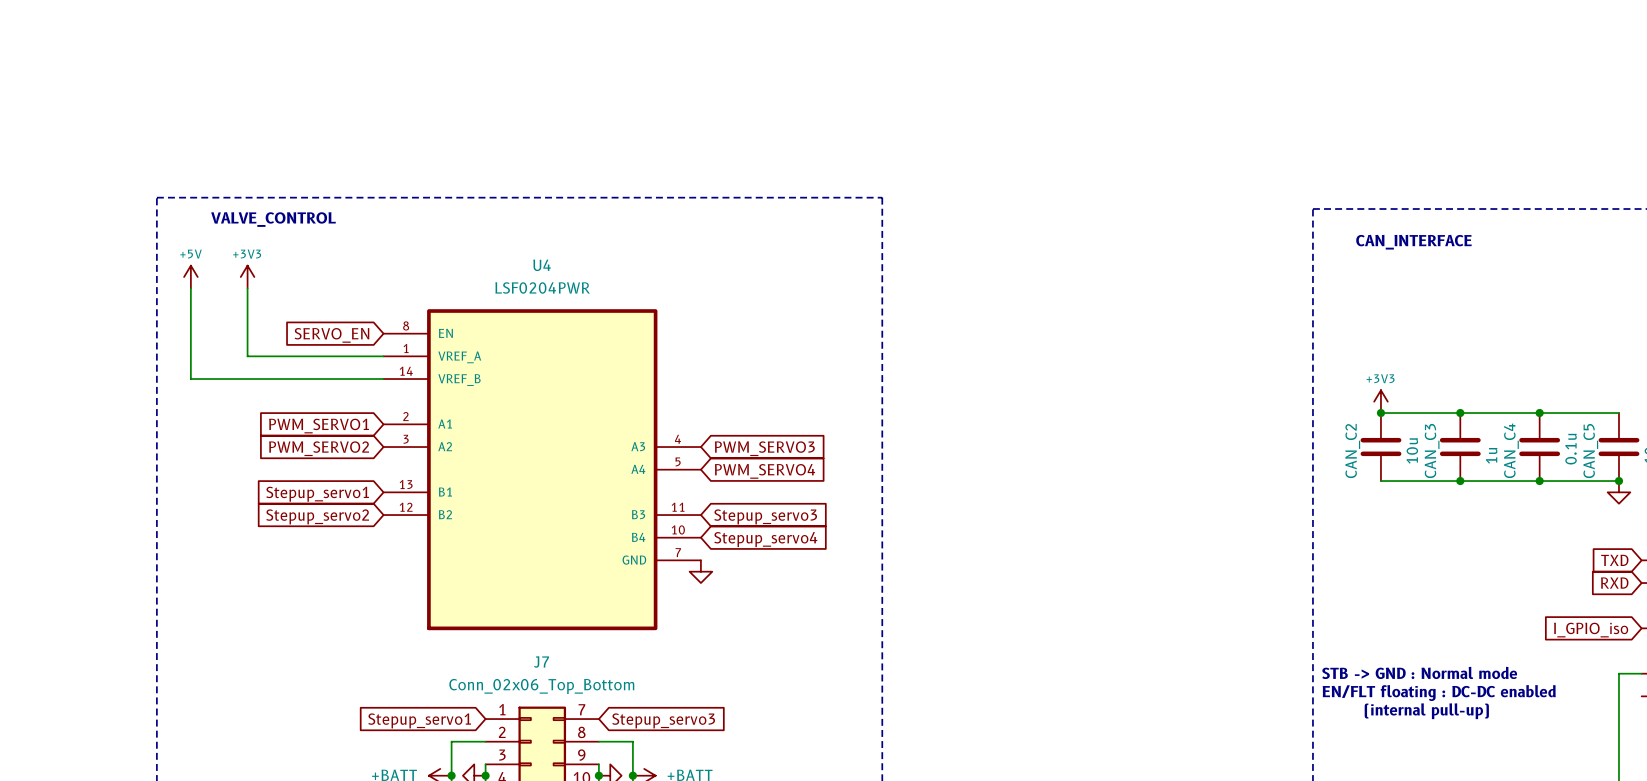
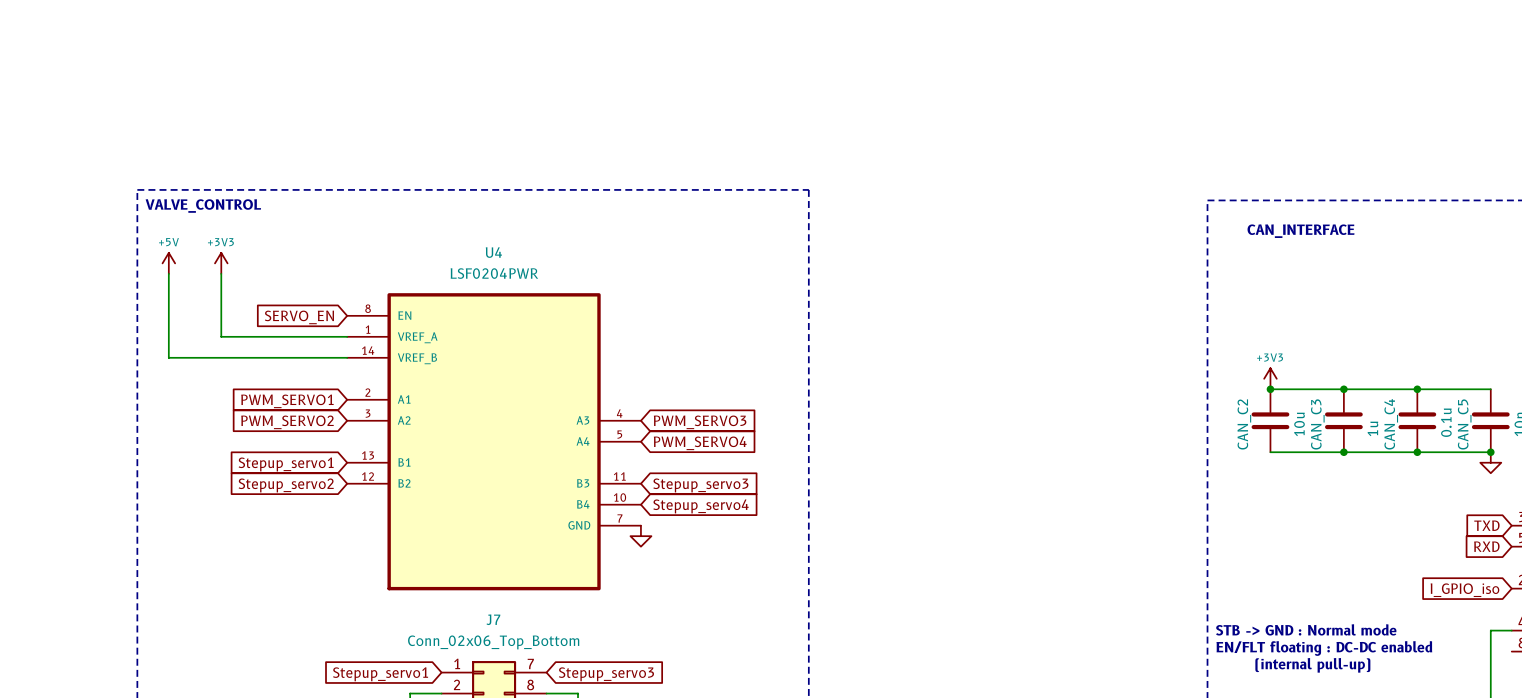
text position: VALVE_CONTROL (273, 219) -> VALVE_CONTROL (203, 205)

